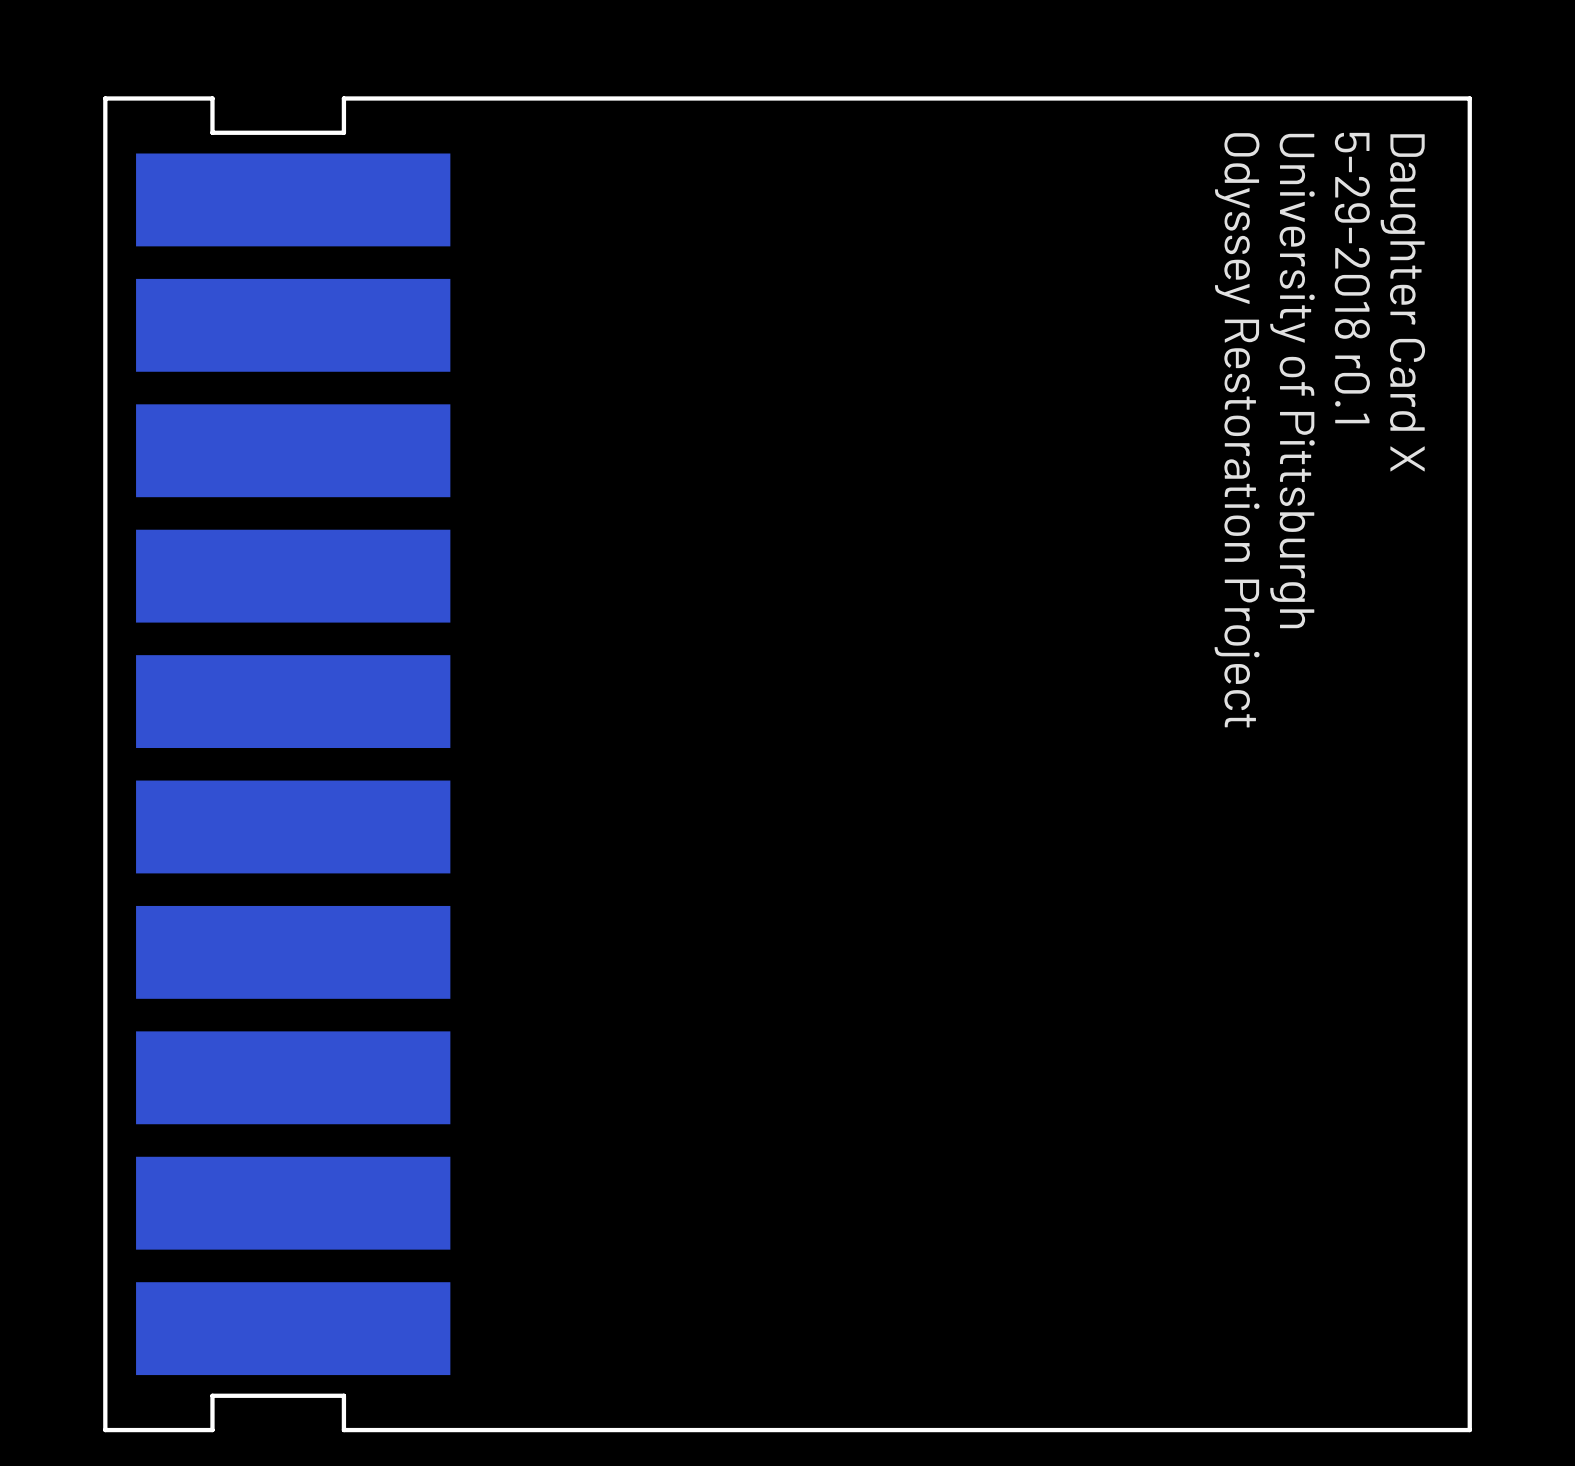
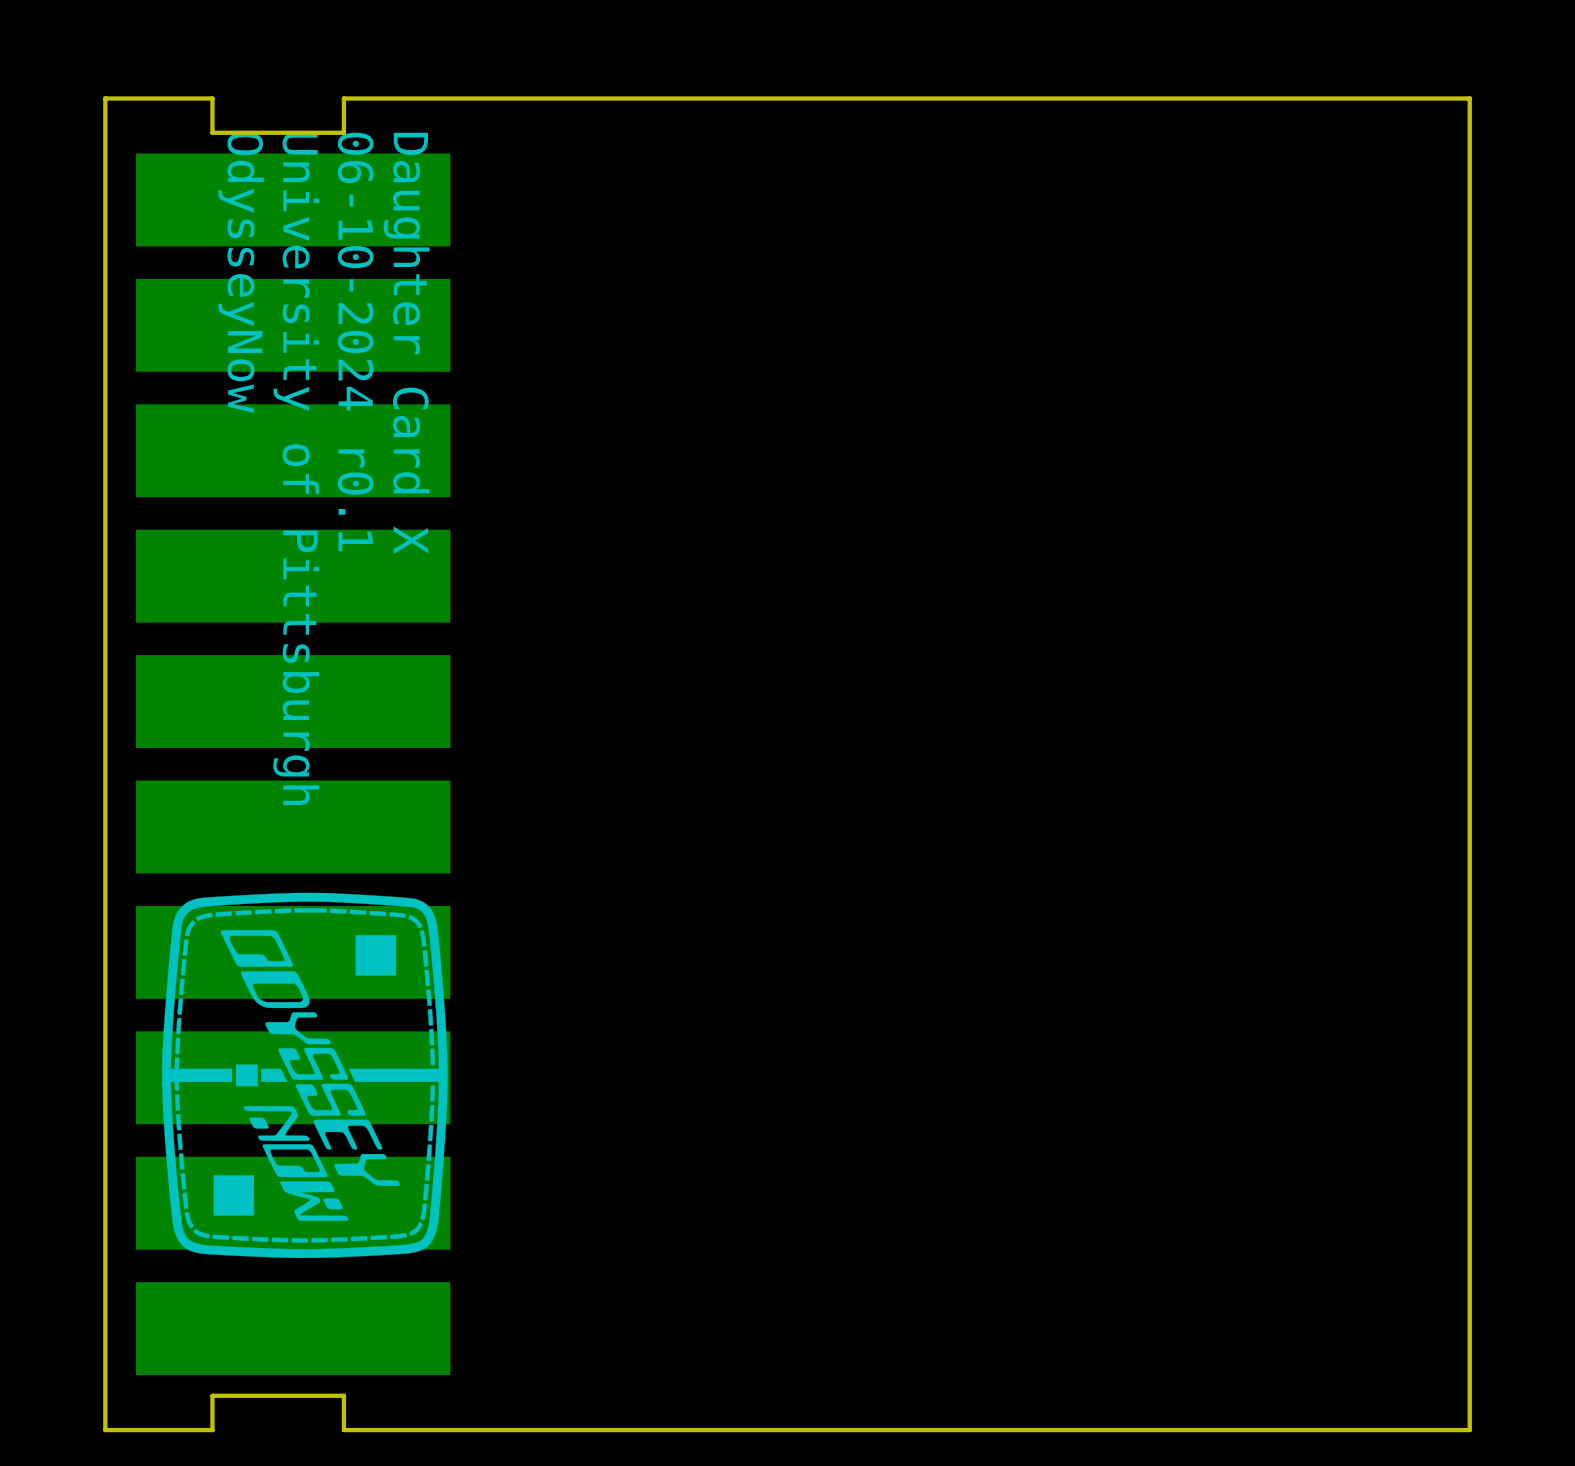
text: none -> OdysseyNow (241, 272)
text: 5-29-2018 r0.1 (1352, 278) -> none
text: none -> 06-10-2024 r0.1 (355, 341)
text: none -> Daughter Card X (406, 343)
text: Daughter Card X (1402, 302) -> none
text: none -> University of Pittsburgh (296, 469)
text: University of Pittsburgh (1292, 381) -> none
text: Odyssey Restoration Project (1237, 430) -> none
drawing: none -> [162, 892, 448, 1258]

